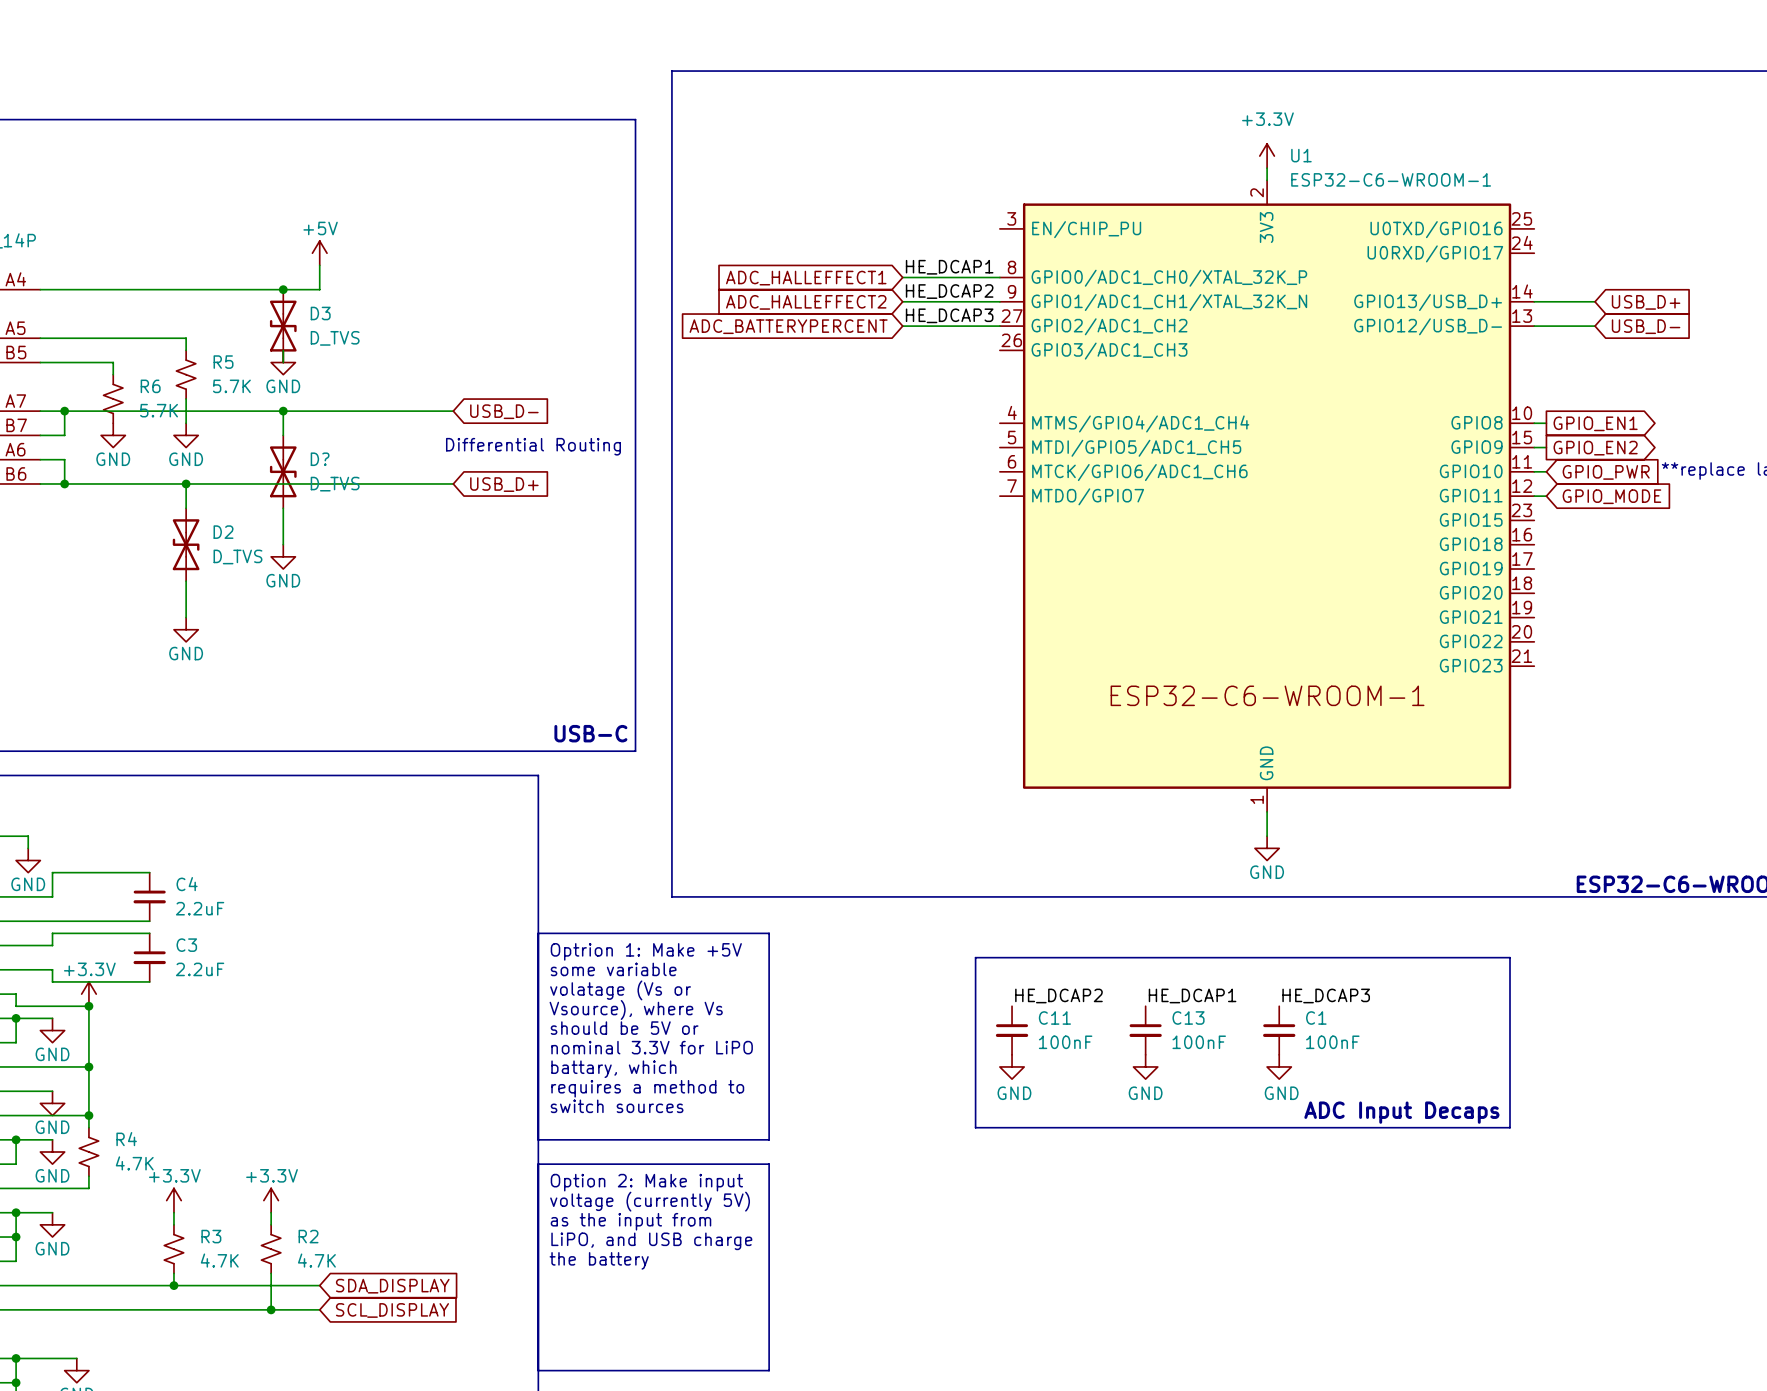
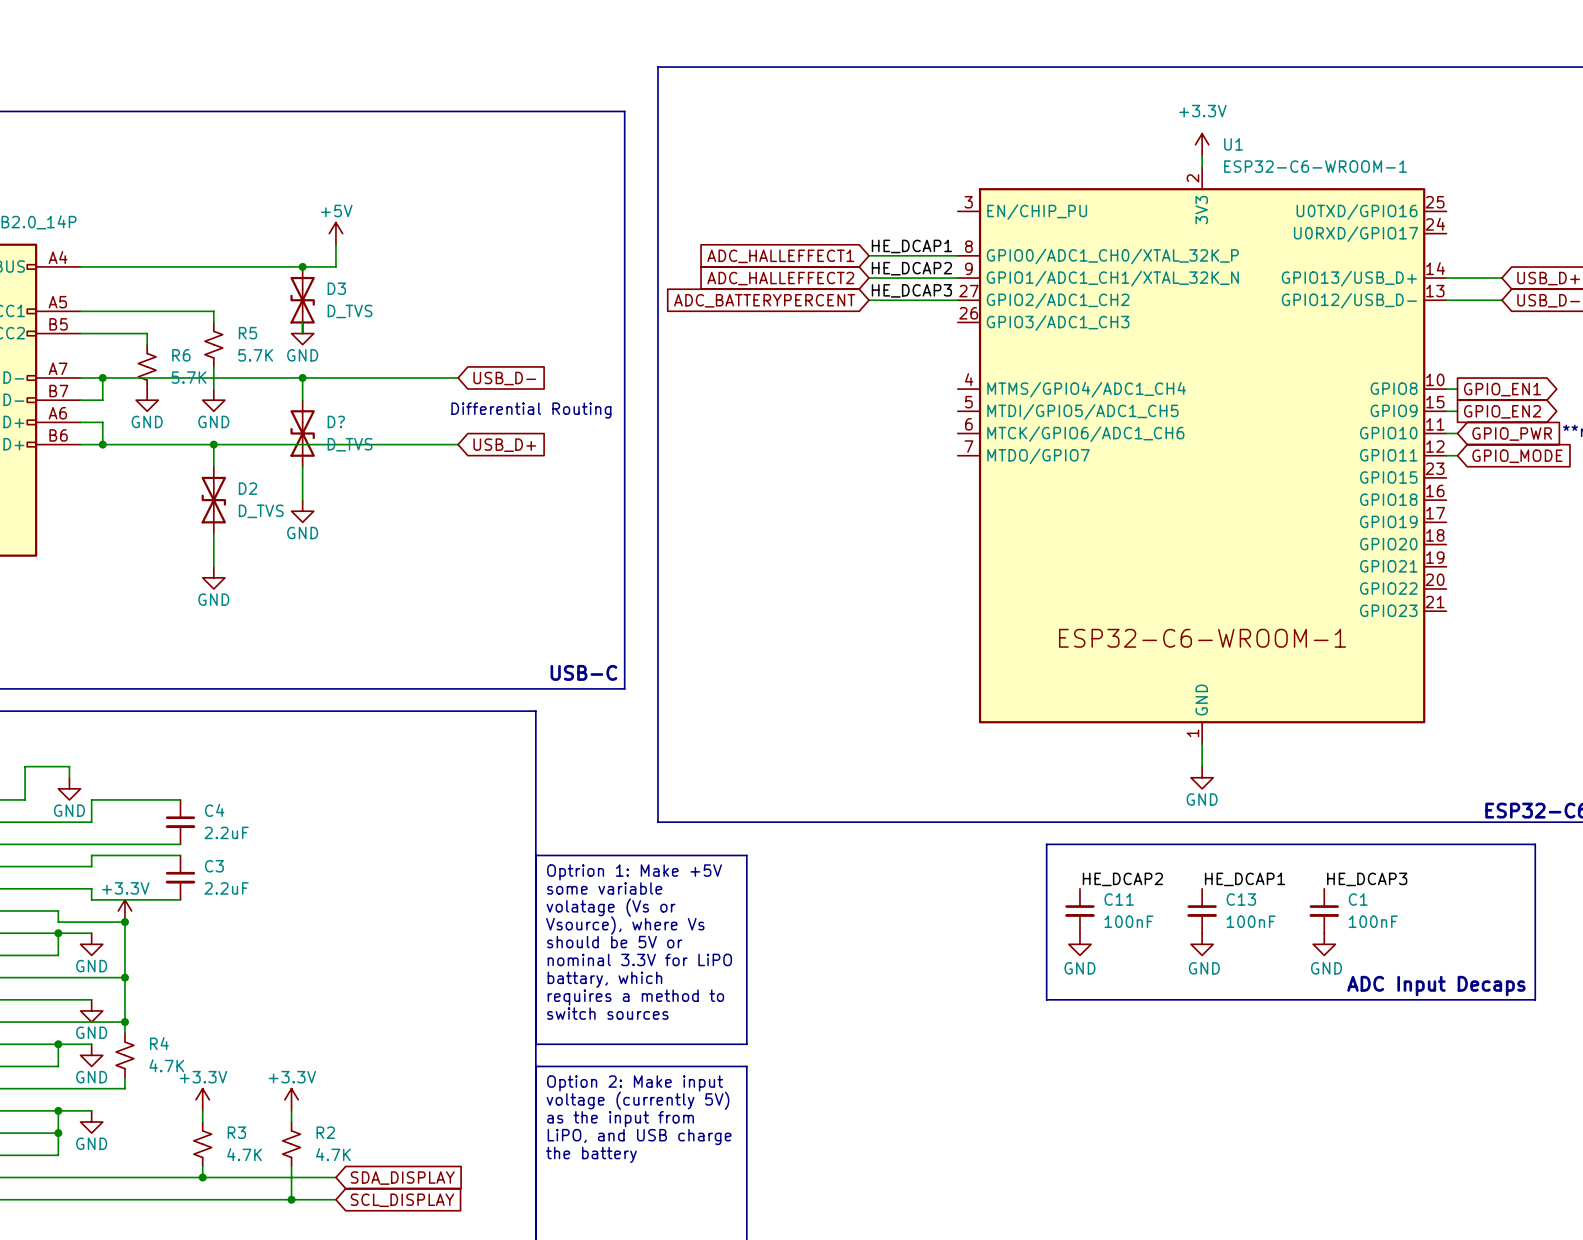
line: (975, 957) (1509, 957) (1509, 1127) (975, 1127) (975, 957) -> (1046, 844) (1535, 844) (1535, 999) (1046, 999) (1046, 844)
label position: HE_DCAP2 (1058, 995) -> HE_DCAP2 (1122, 879)
label position: HE_DCAP1 (1192, 995) -> HE_DCAP1 (1245, 879)
label position: HE_DCAP3 (1326, 995) -> HE_DCAP3 (1367, 879)
C11 position: (1012, 1030) -> (1079, 911)
C13 position: (1145, 1030) -> (1202, 911)
C1 position: (1279, 1030) -> (1324, 911)
power symbol: none -> GND (1324, 944)
power symbol: GND (1012, 1066) -> none
power symbol position: GND (1145, 1066) -> GND (1079, 944)
power symbol position: GND (1279, 1066) -> GND (1202, 944)
text position: ADC Input Decaps (1401, 1112) -> ADC Input Decaps (1436, 986)

